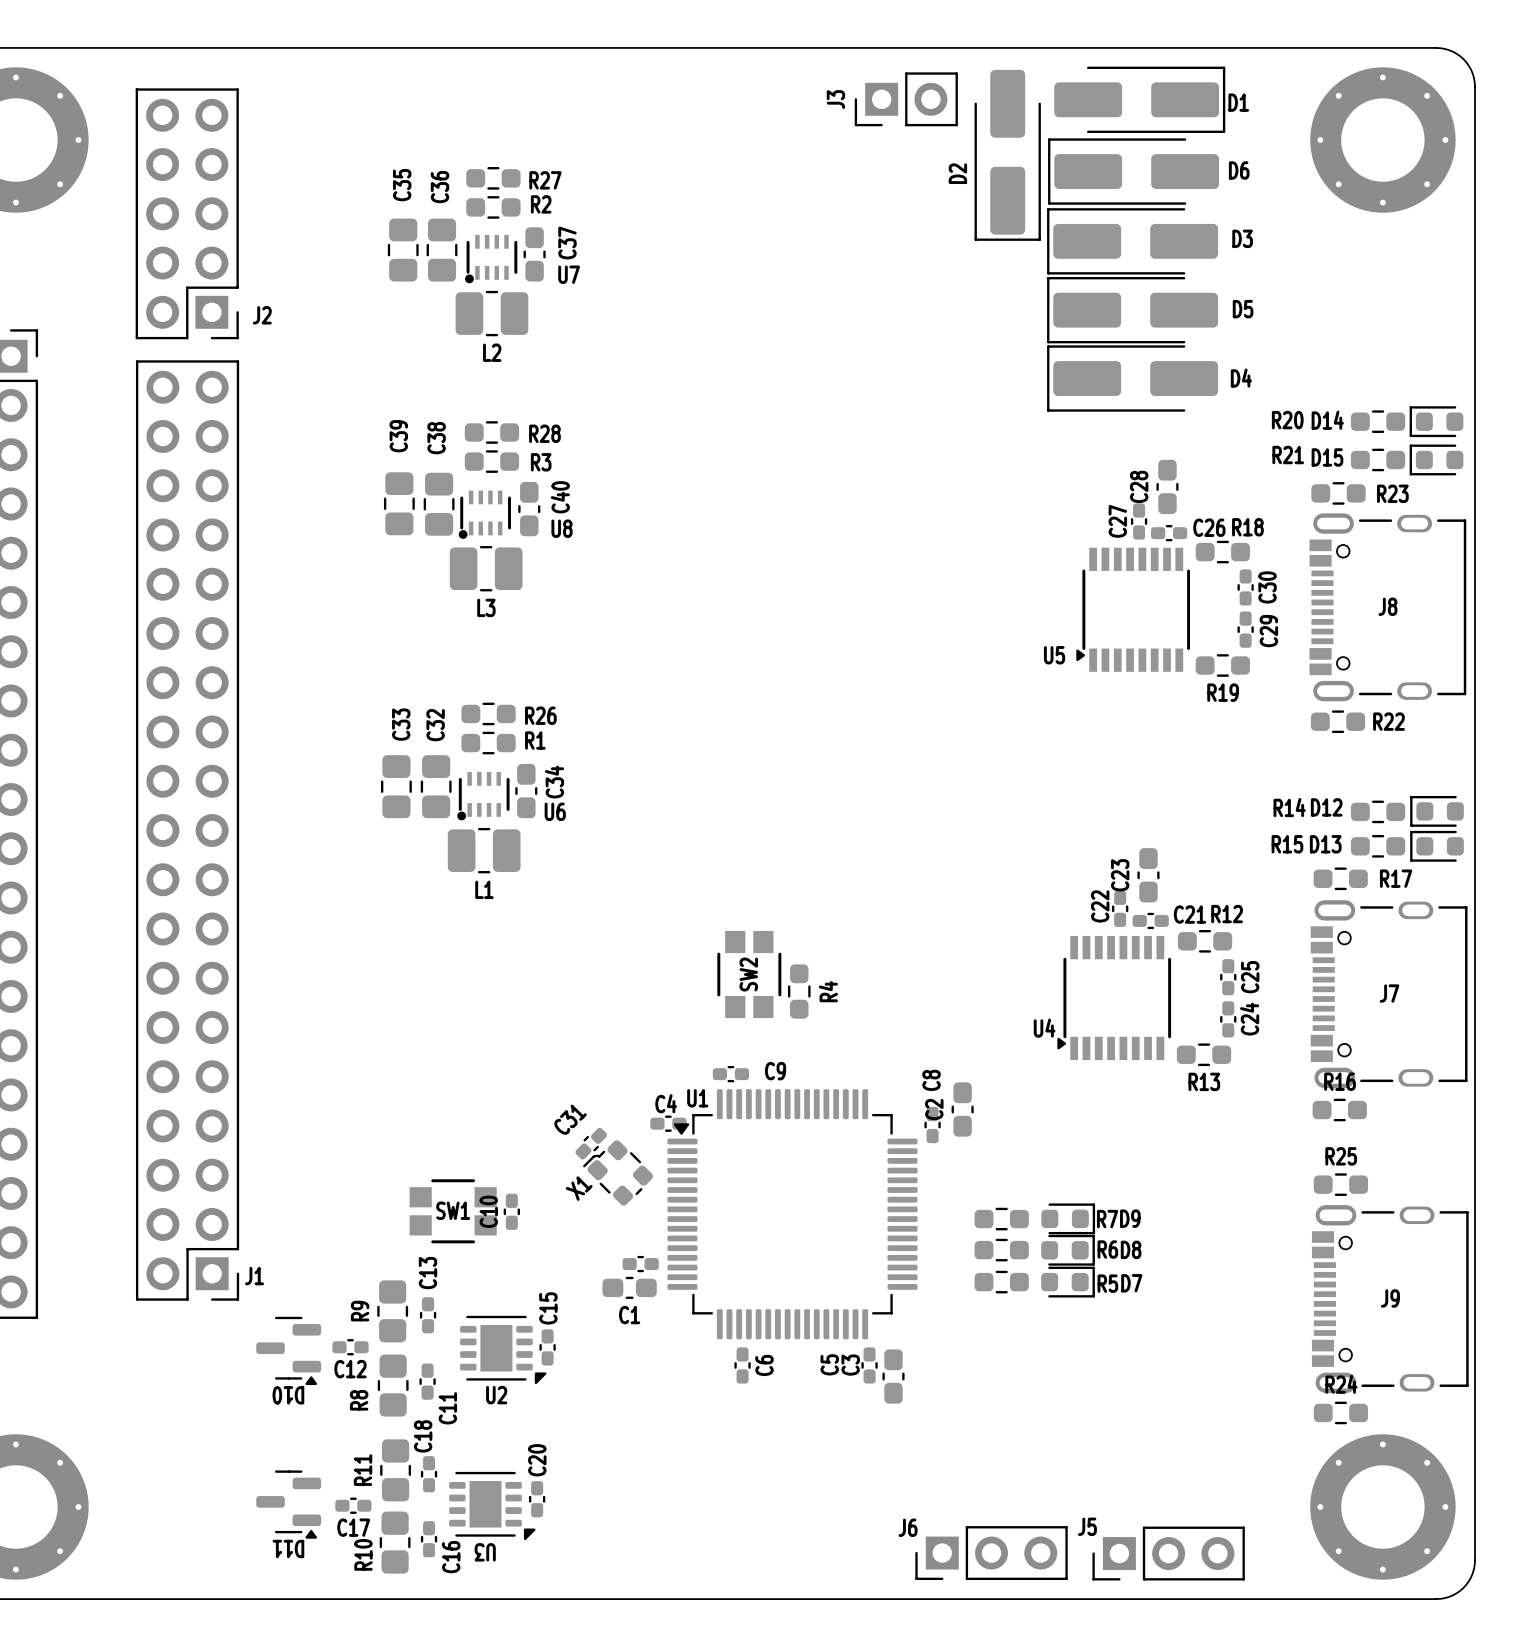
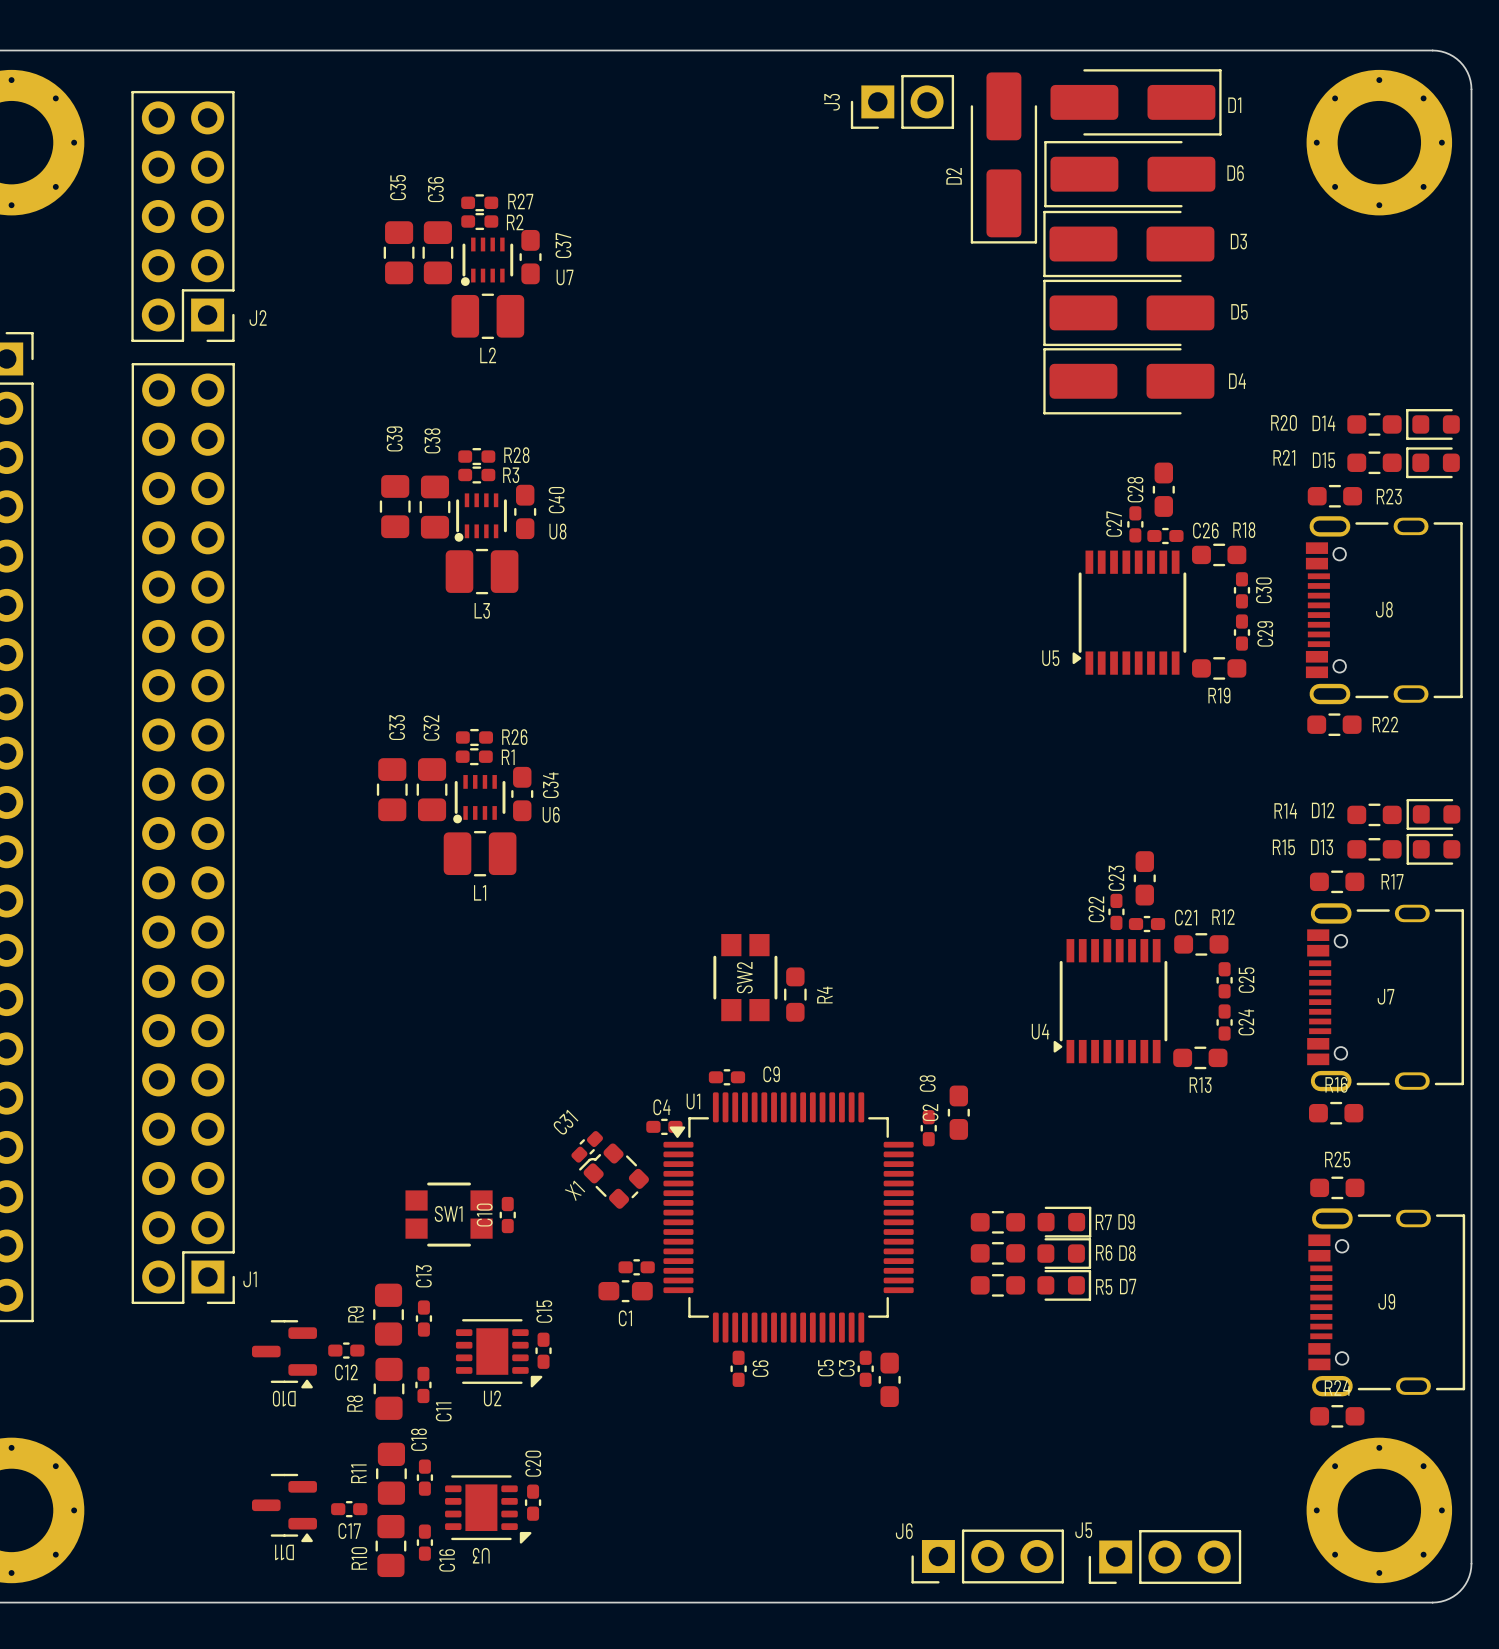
R27 footprint: [466, 167, 521, 190] -> [461, 194, 499, 212]
R2 footprint: [466, 196, 521, 219] -> [461, 212, 499, 231]
R28 footprint: [464, 421, 520, 444] -> [458, 448, 496, 466]
R3 footprint: [464, 450, 520, 473] -> [458, 466, 496, 484]
R26 footprint: [461, 702, 516, 726] -> [455, 728, 494, 747]
R1 footprint: [461, 731, 516, 755] -> [455, 748, 493, 766]

